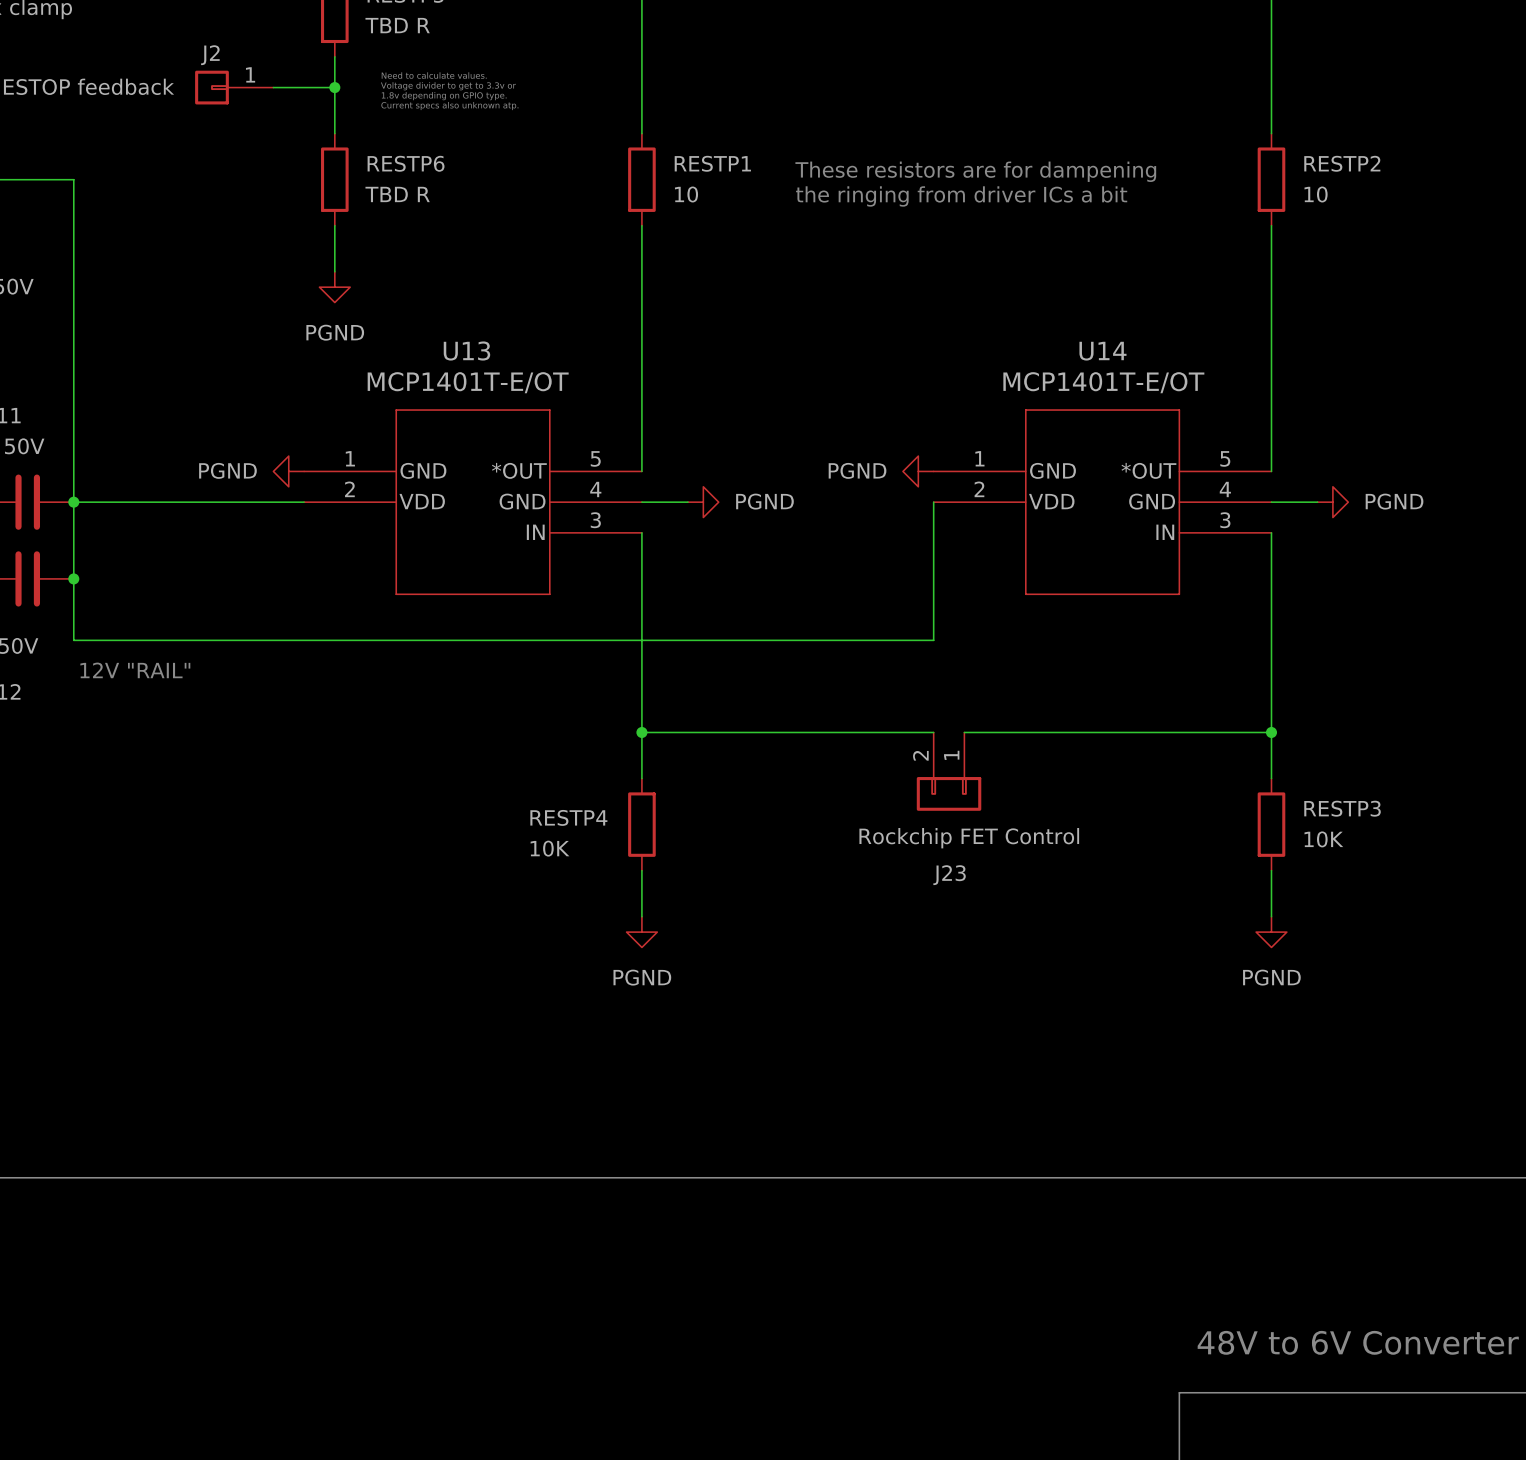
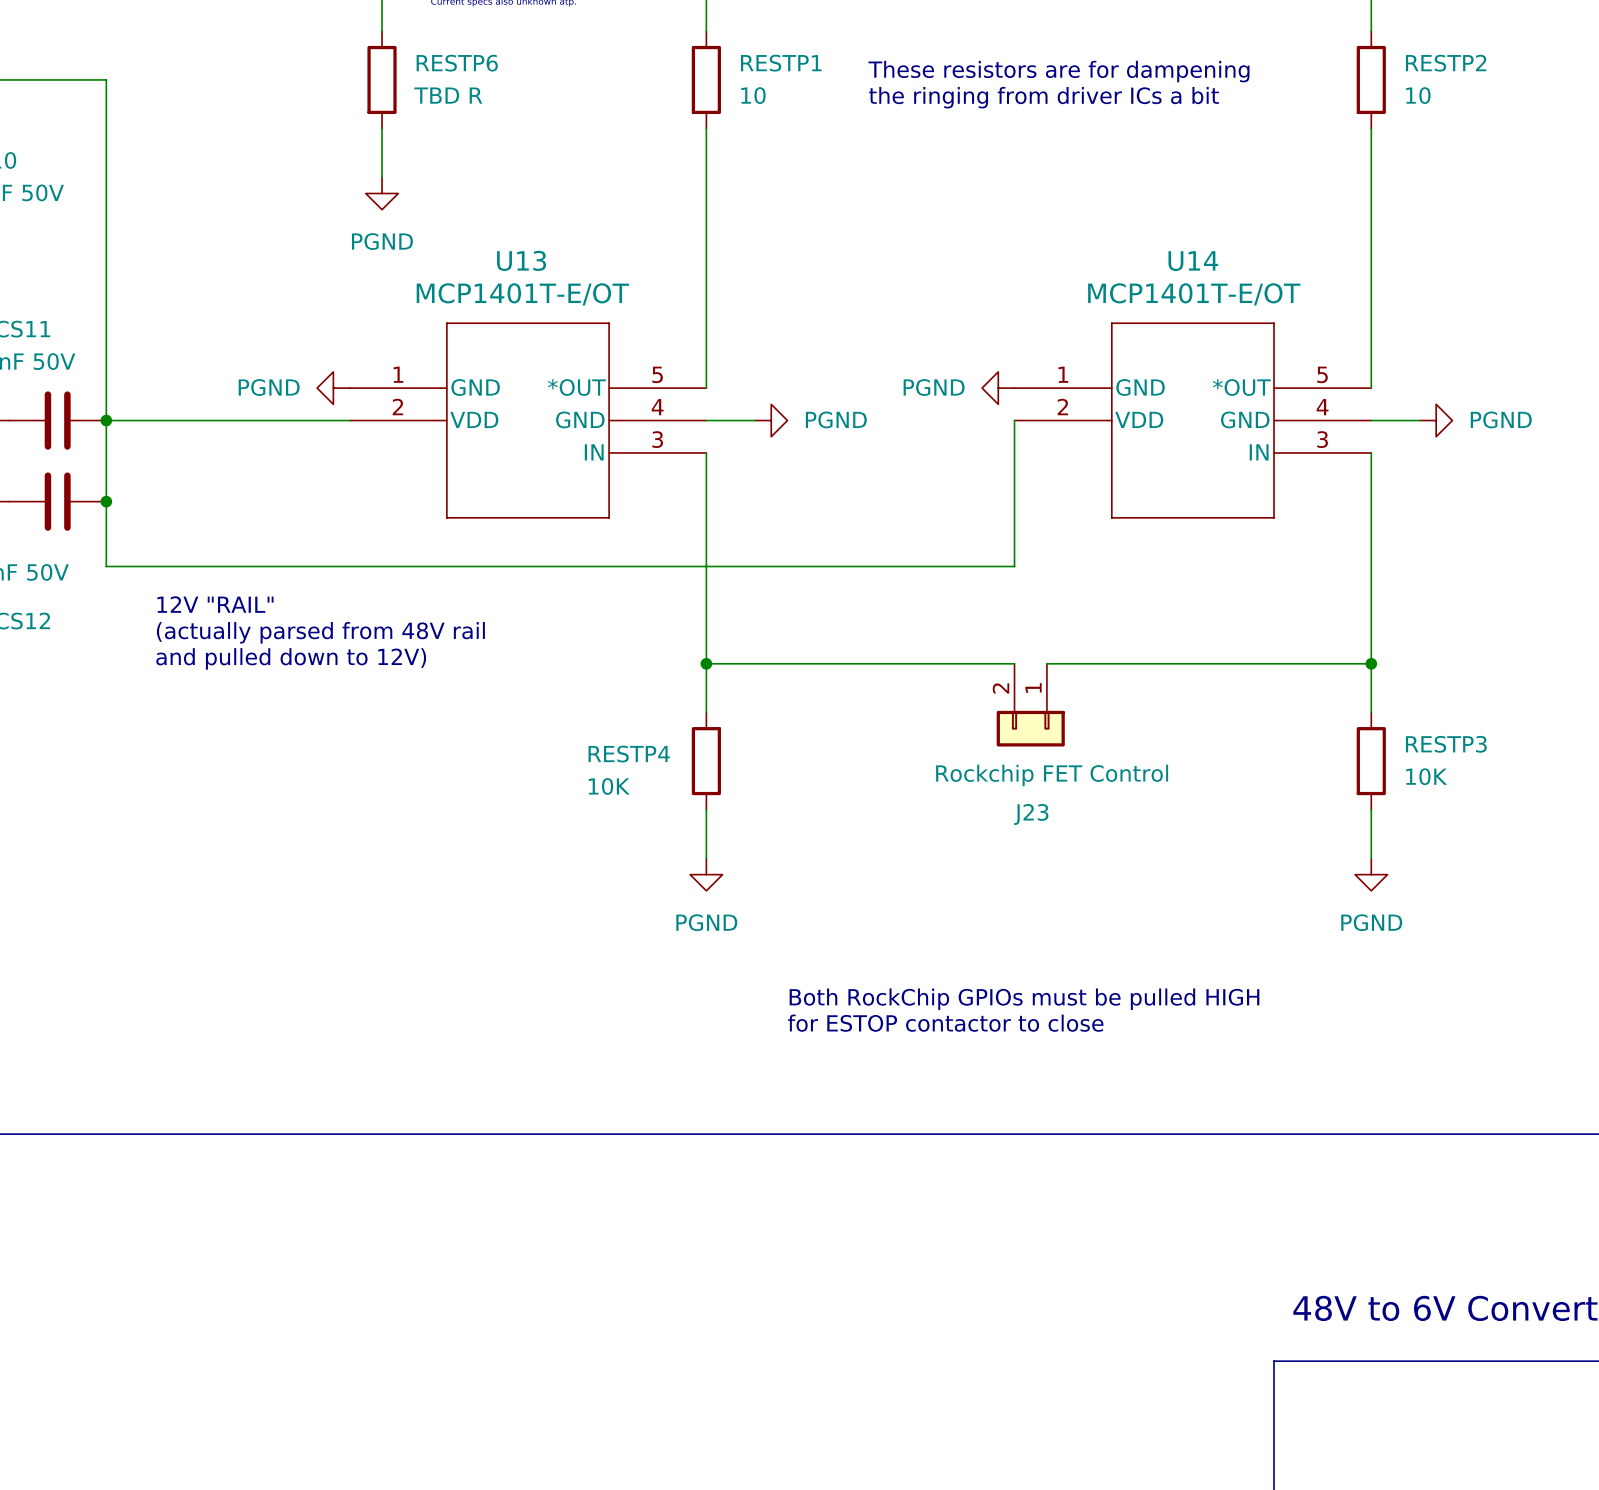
text position: 12V "RAIL" (135, 670) -> 12V "RAIL" (215, 604)
text: none -> (actually parsed from 48V rail (320, 632)
text: none -> and pulled down to 12V) (291, 658)
text: none -> Both RockChip GPIOs must be pulled HIGH (1024, 999)
text: none -> for ESTOP contactor to close (945, 1023)

